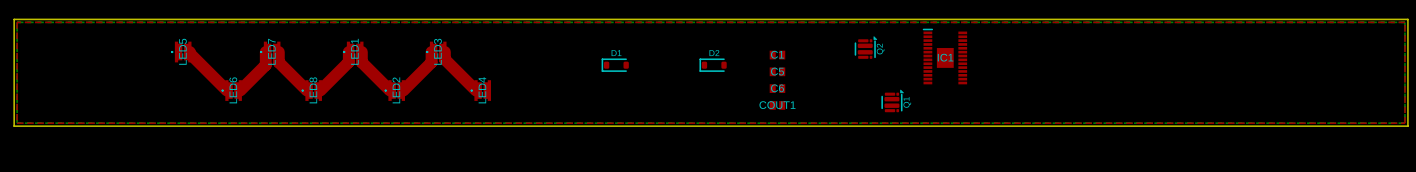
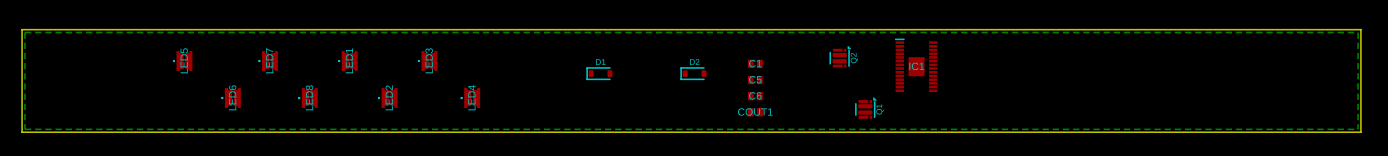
top zone outline: (17, 22) (17, 123) (1404, 123) (1404, 22) (17, 22) -> none
top track: (189, 52) (226, 90) -> none
top track: (265, 52) (265, 65) (240, 90) -> none
top track: (278, 52) (278, 62) (306, 90) -> none
top track: (348, 52) (348, 62) (320, 90) -> none
top track: (361, 52) (361, 62) (390, 90) -> none
top track: (431, 52) (431, 62) (403, 90) -> none
top track: (444, 52) (444, 59) (476, 90) -> none

